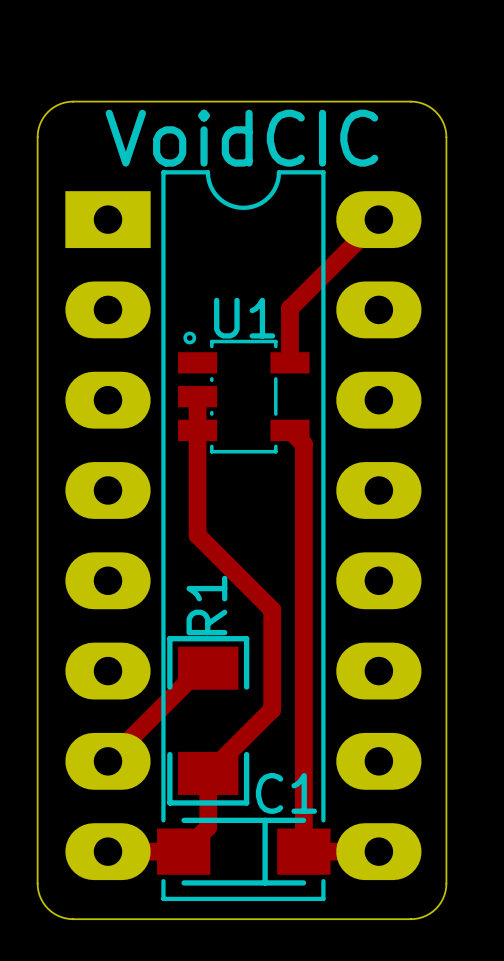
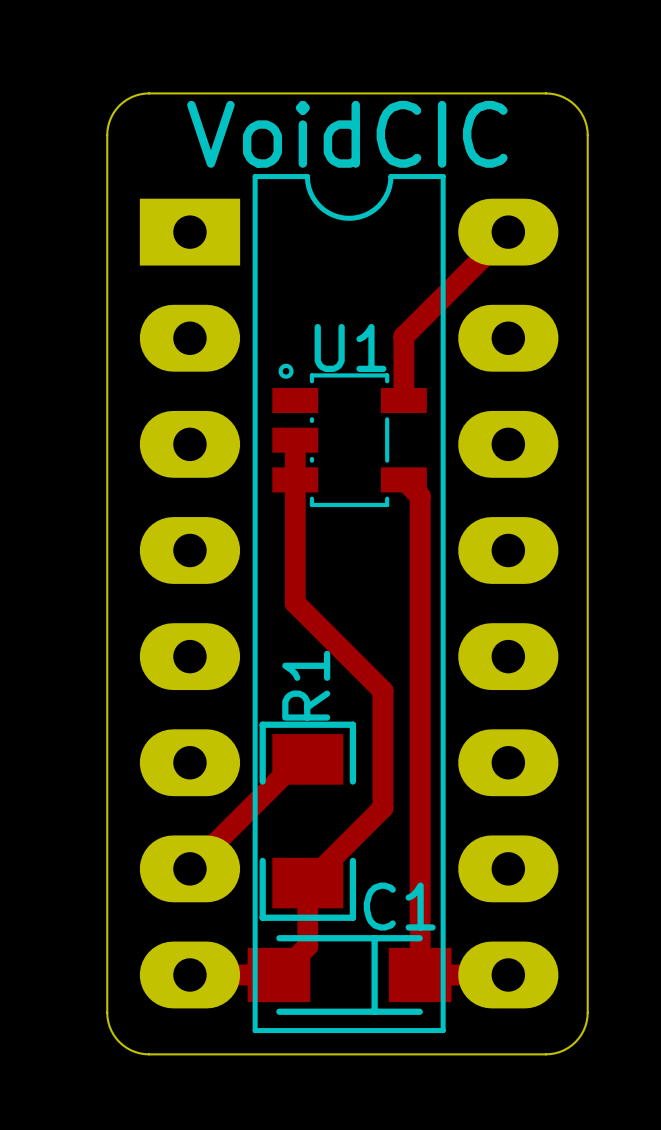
text: none -> VoidCIC (347, 134)
text: VoidCIC (241, 138) -> none
part footprint: [65, 170, 422, 902] -> [139, 174, 559, 1034]

